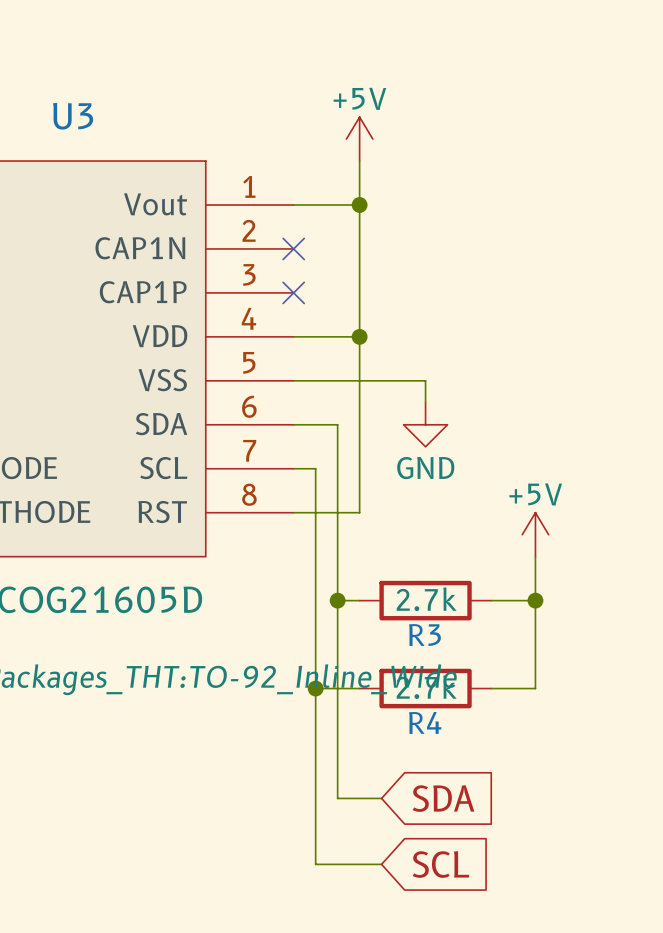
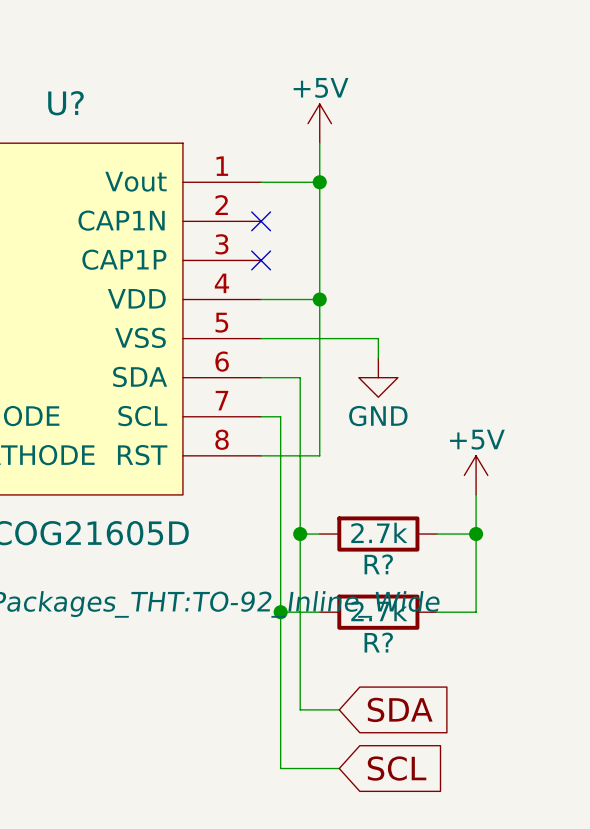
U3 name: U3 (73, 116) -> U? (65, 103)
R3 name: R3 (424, 635) -> R? (378, 564)
R4 name: R4 (425, 722) -> R? (378, 642)

